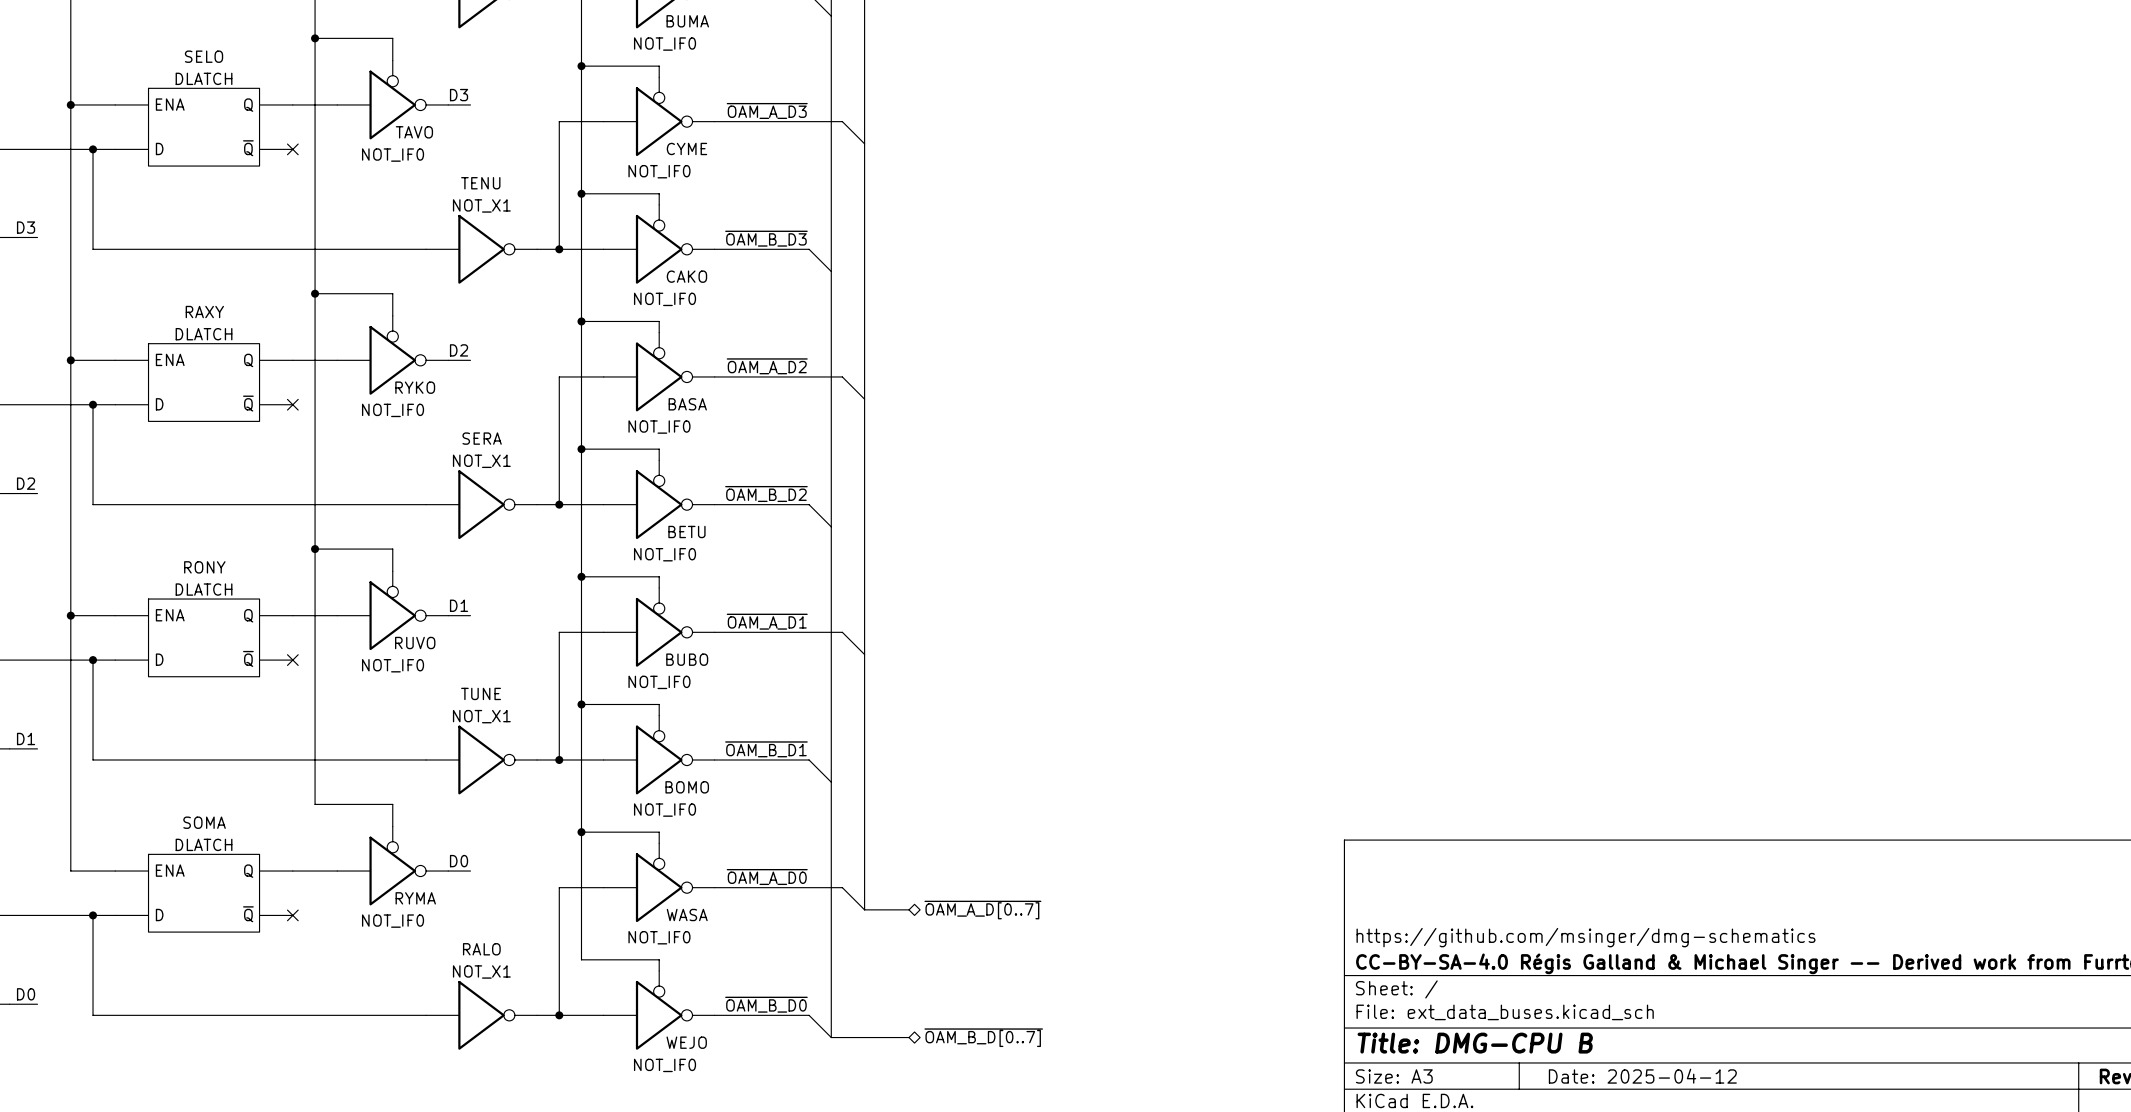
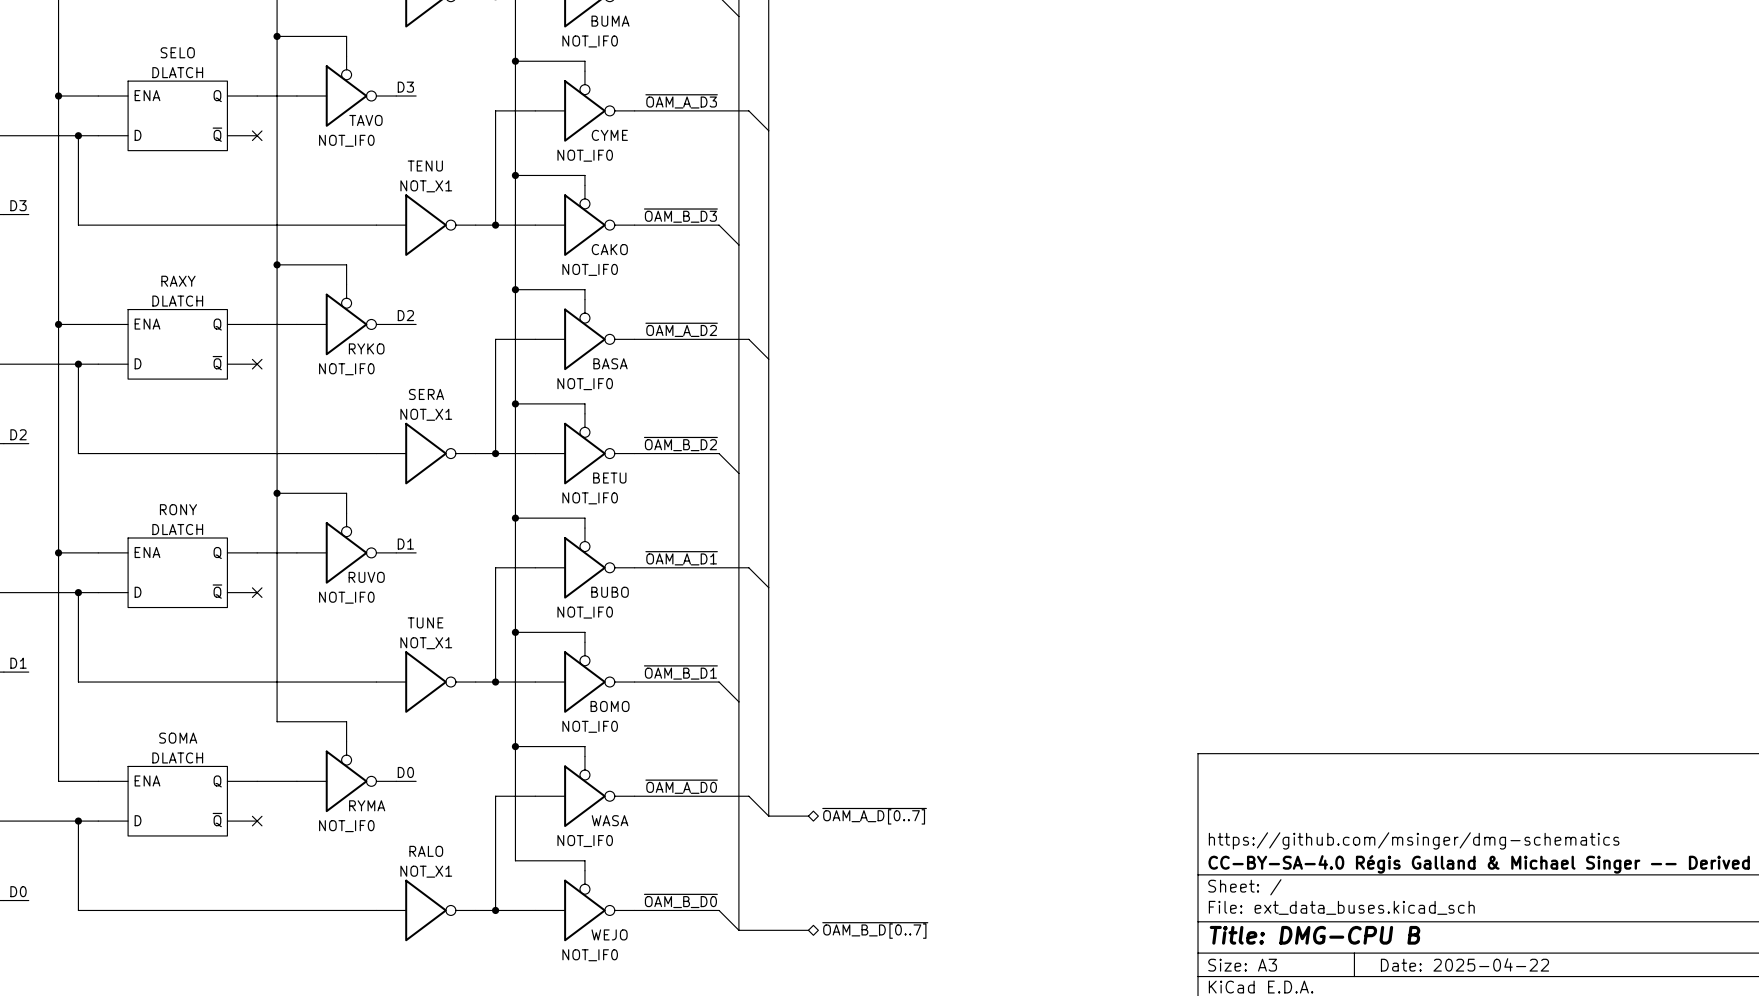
title block: Date: 2025-04-12 (1642, 1076) -> Date: 2025-04-22 (1464, 964)

